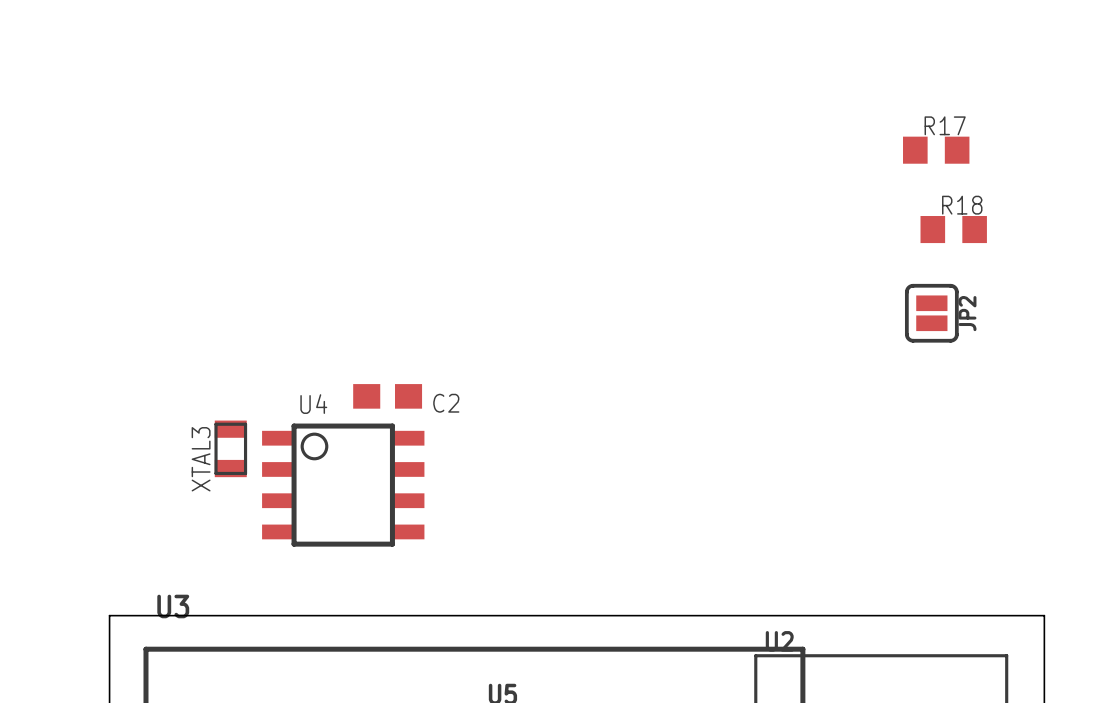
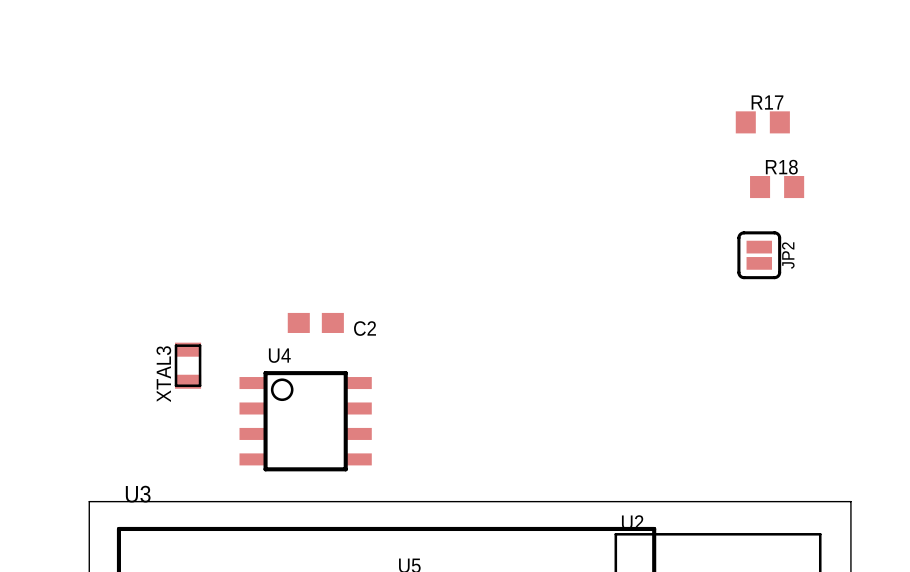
U4 position: (343, 485) -> (305, 421)

